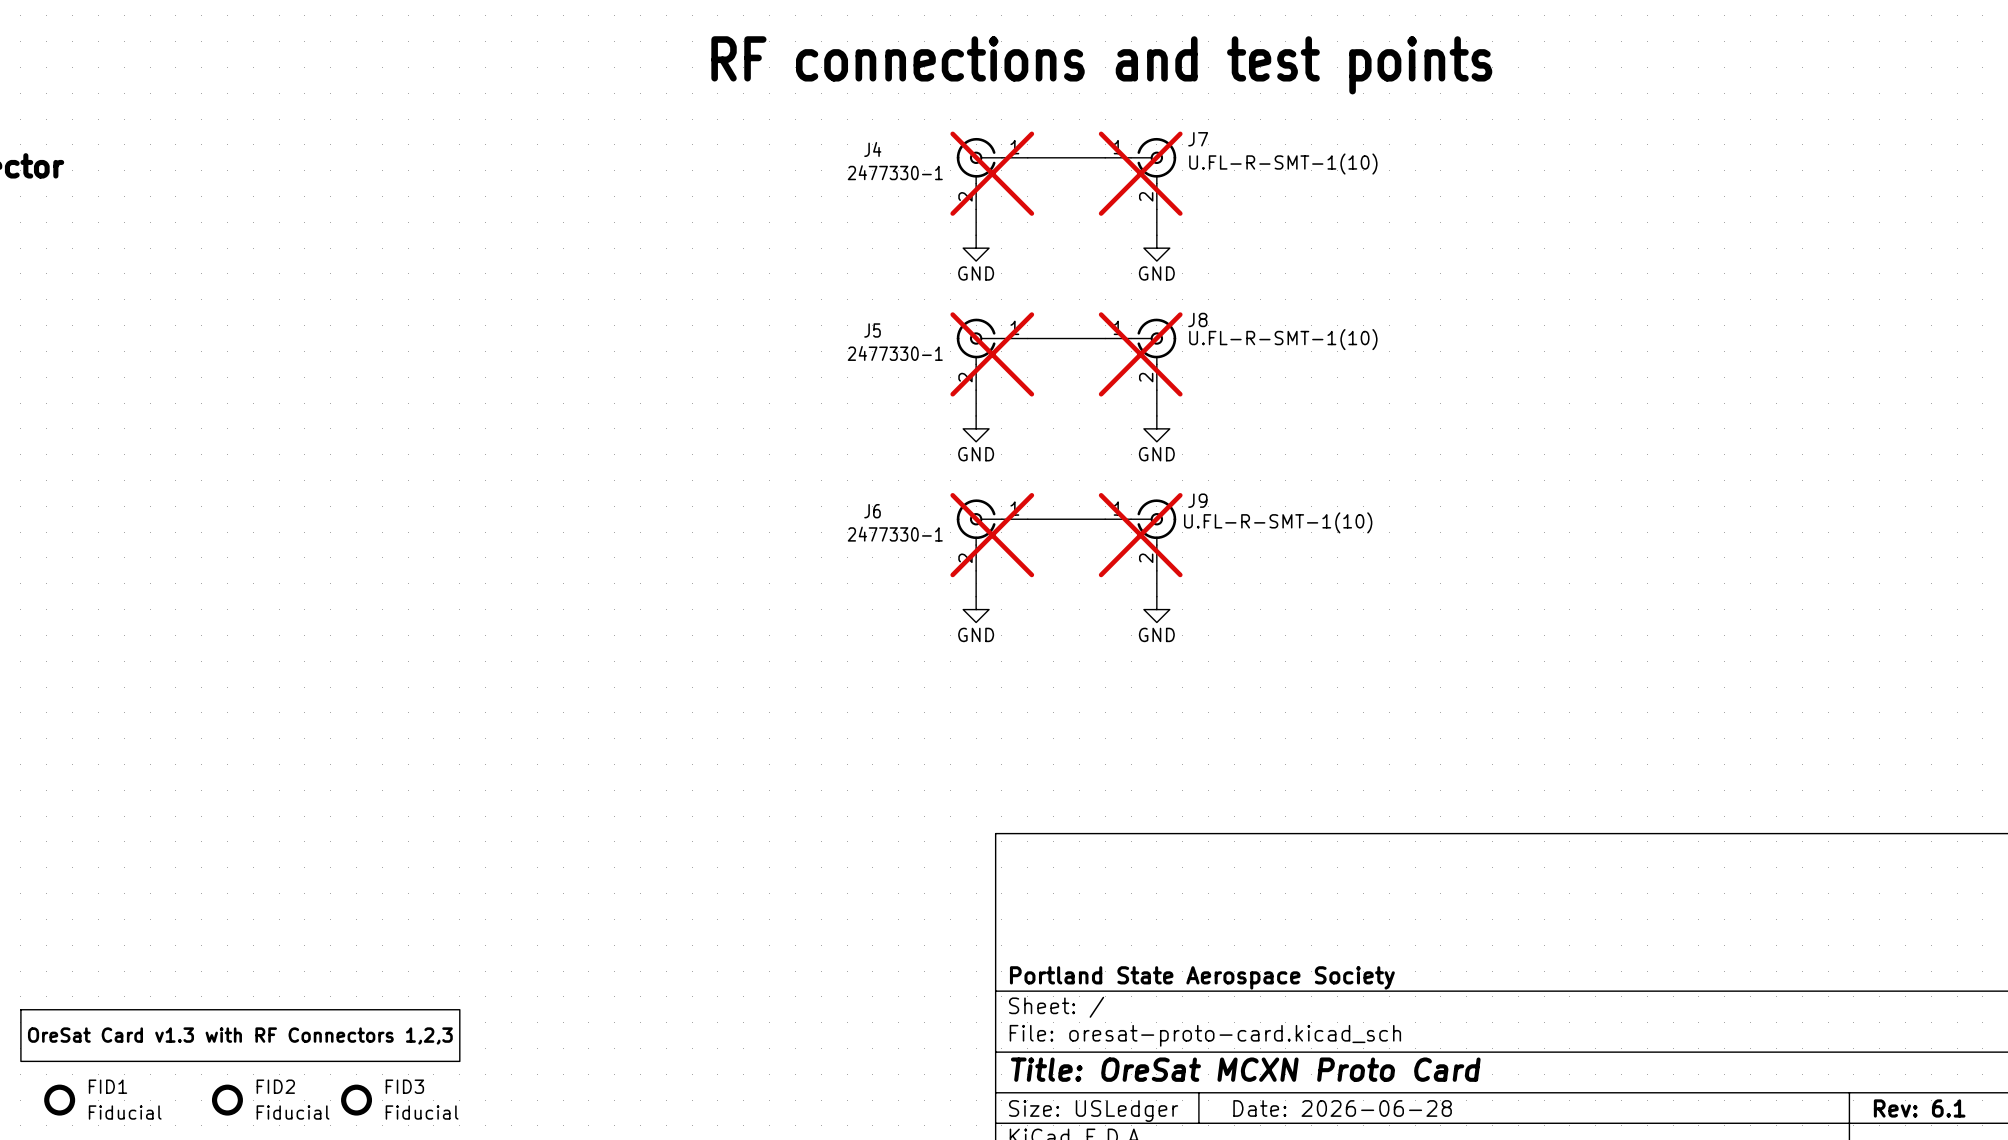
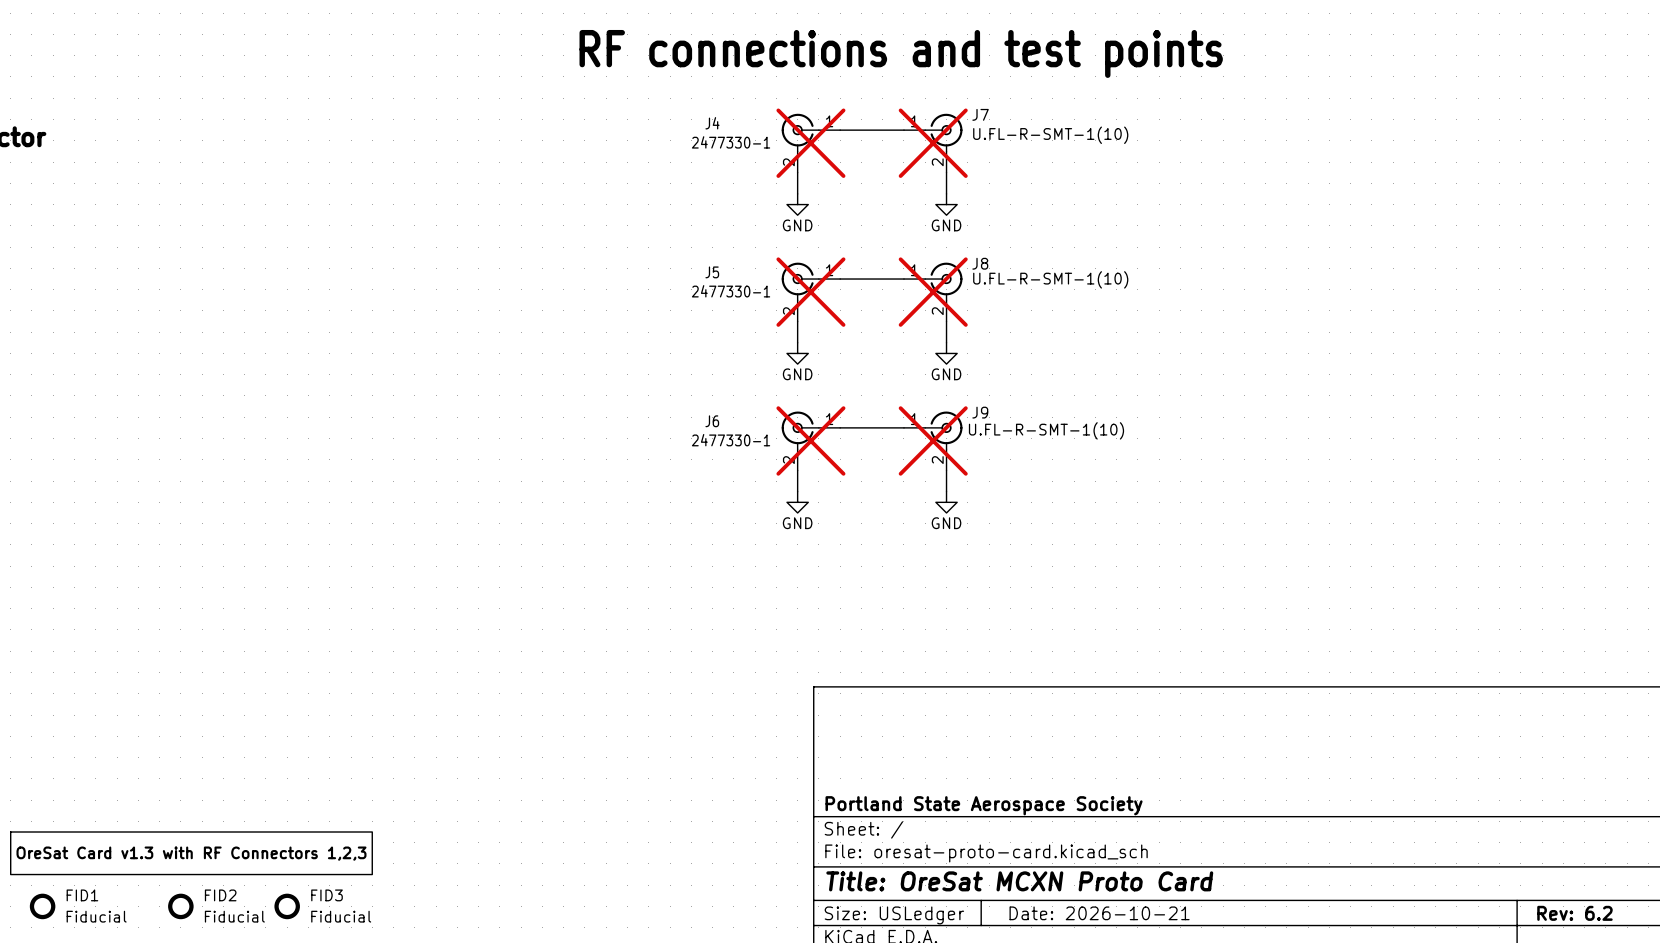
title block: Date: 2026-06-28 (1342, 1108) -> Date: 2026-10-21 (1099, 913)
title block: Rev: 6.1 (1919, 1108) -> Rev: 6.2 (1574, 913)

